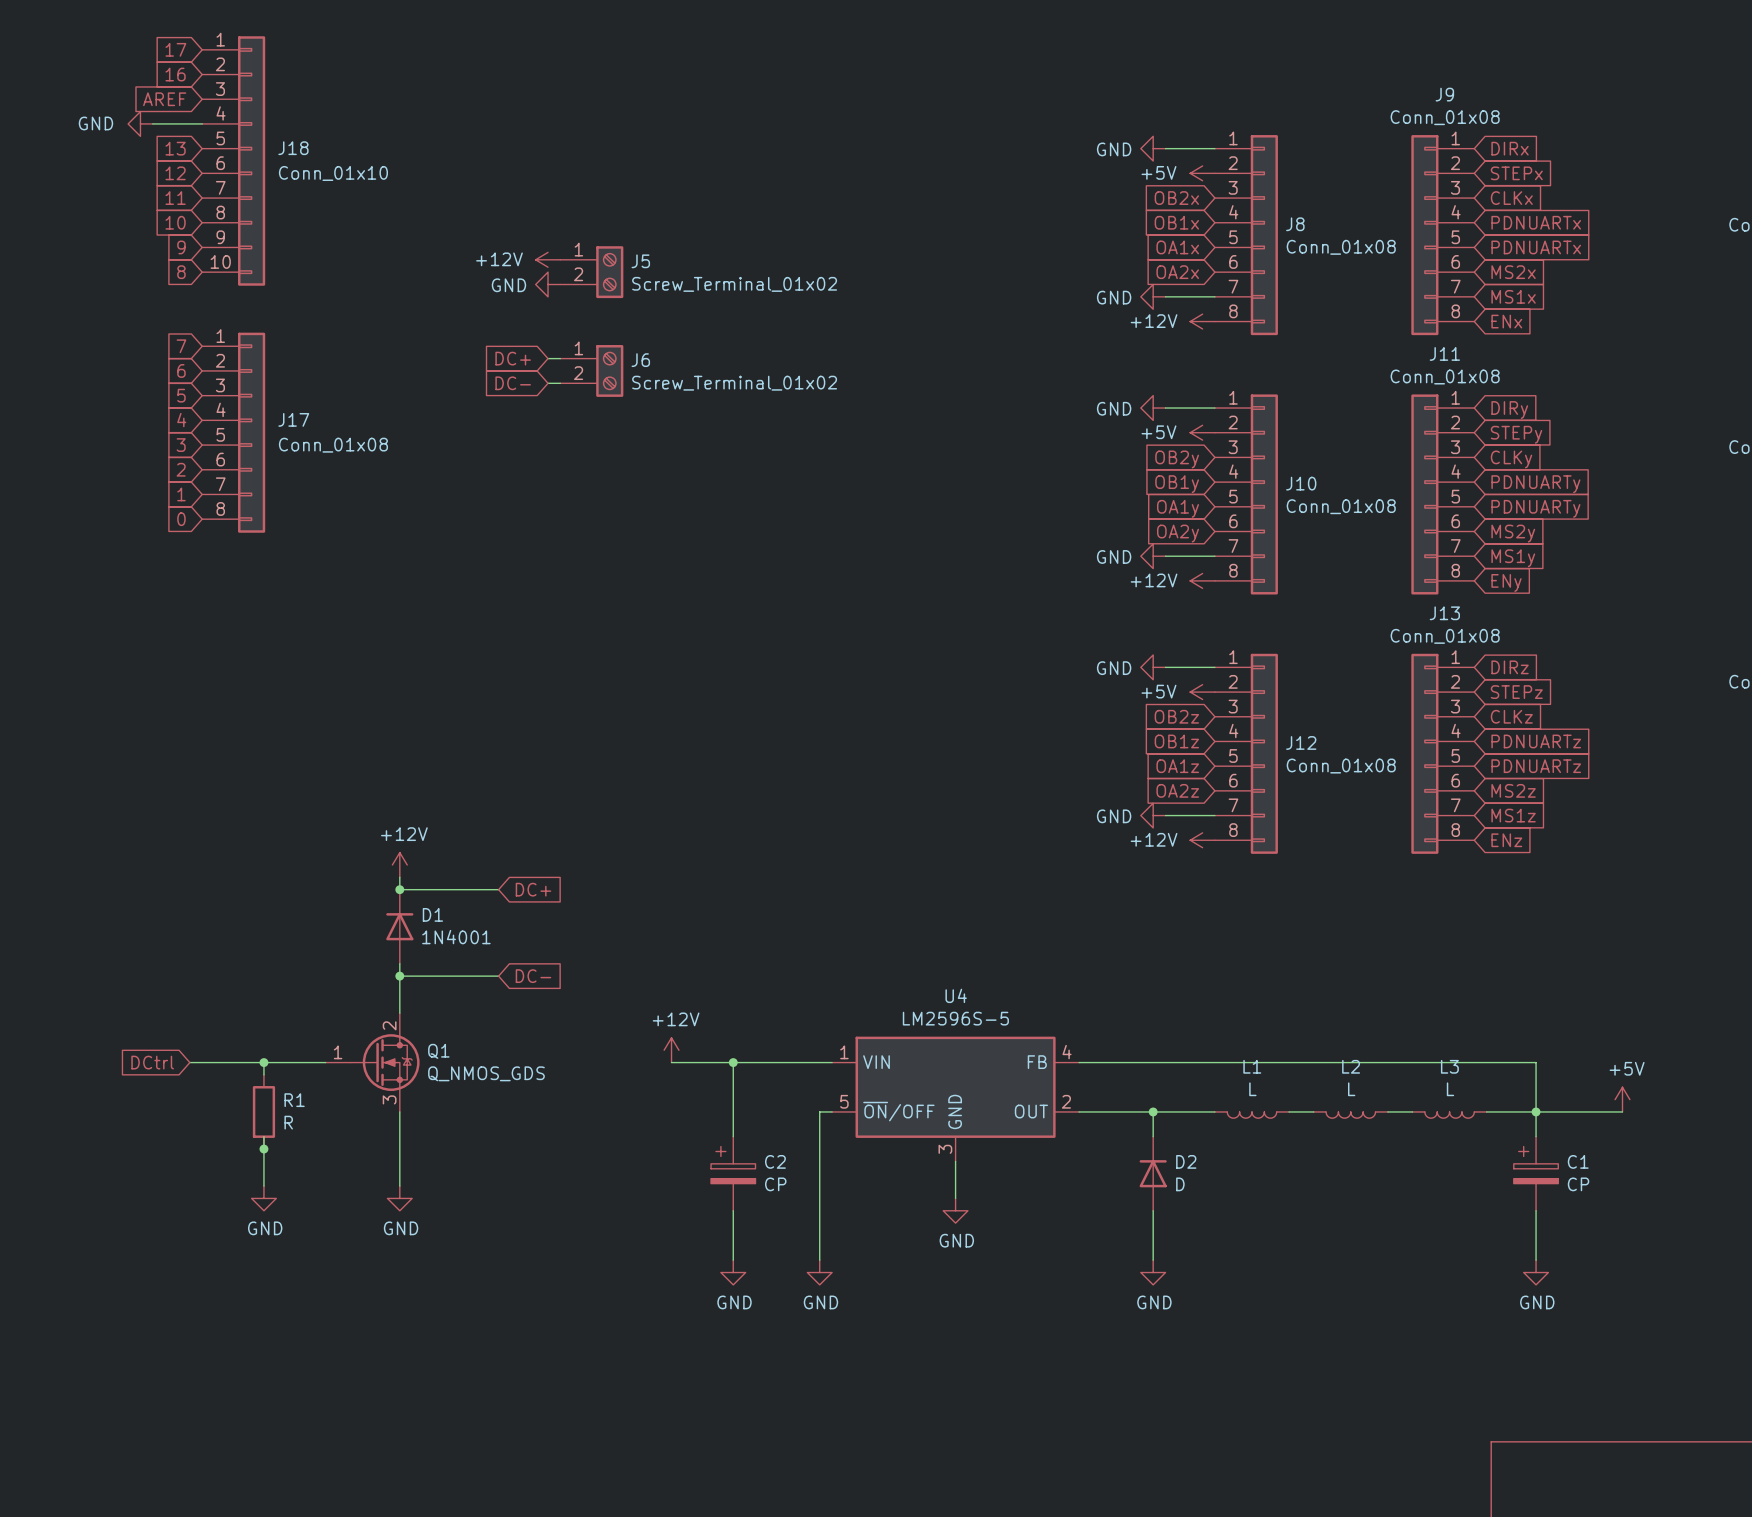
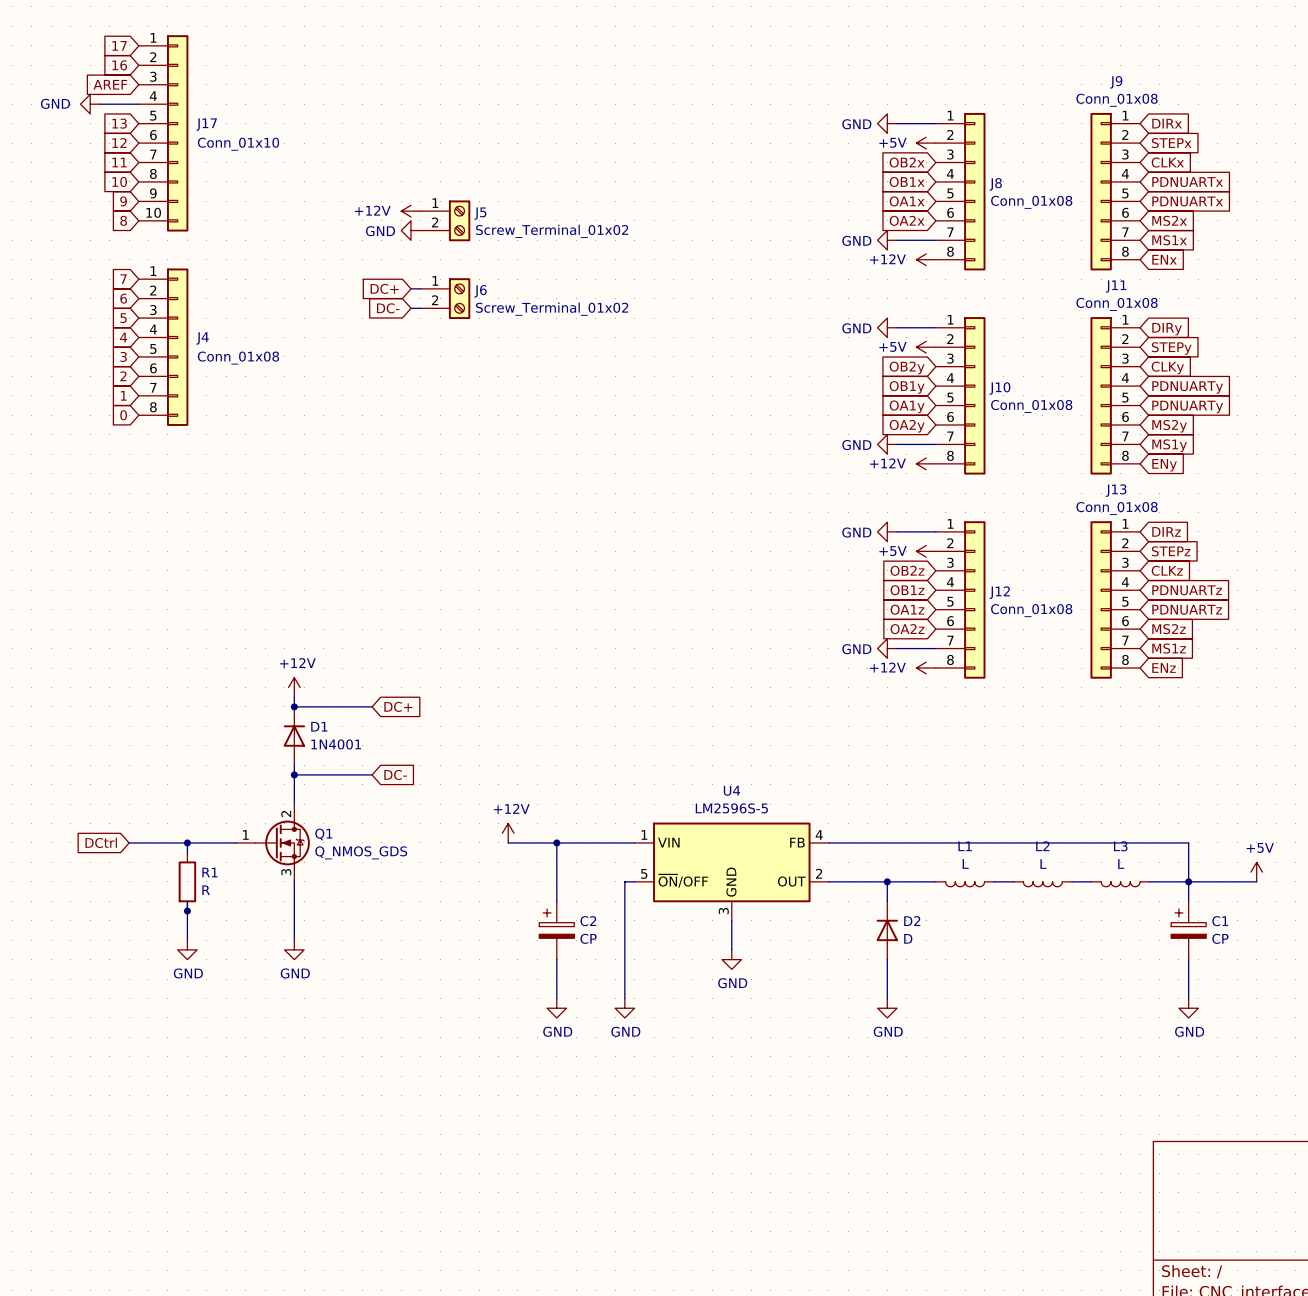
J18 name: J18 (293, 148) -> J17 (206, 124)
J17 name: J17 (293, 419) -> J4 (202, 338)

